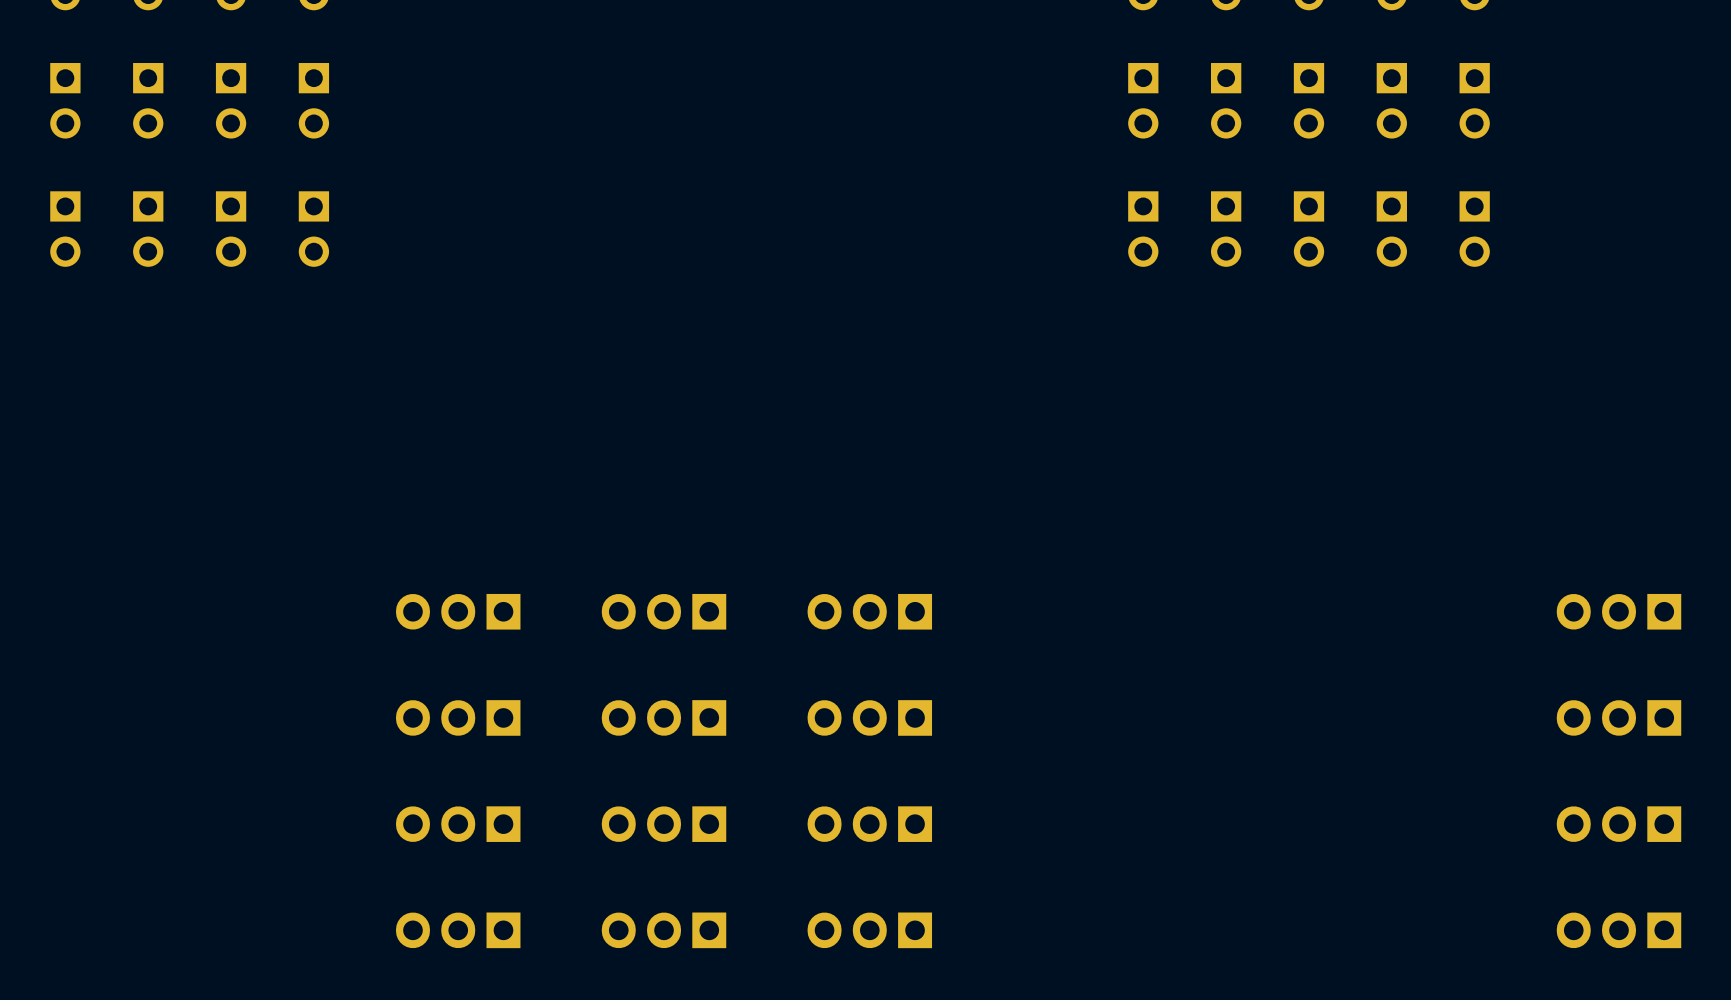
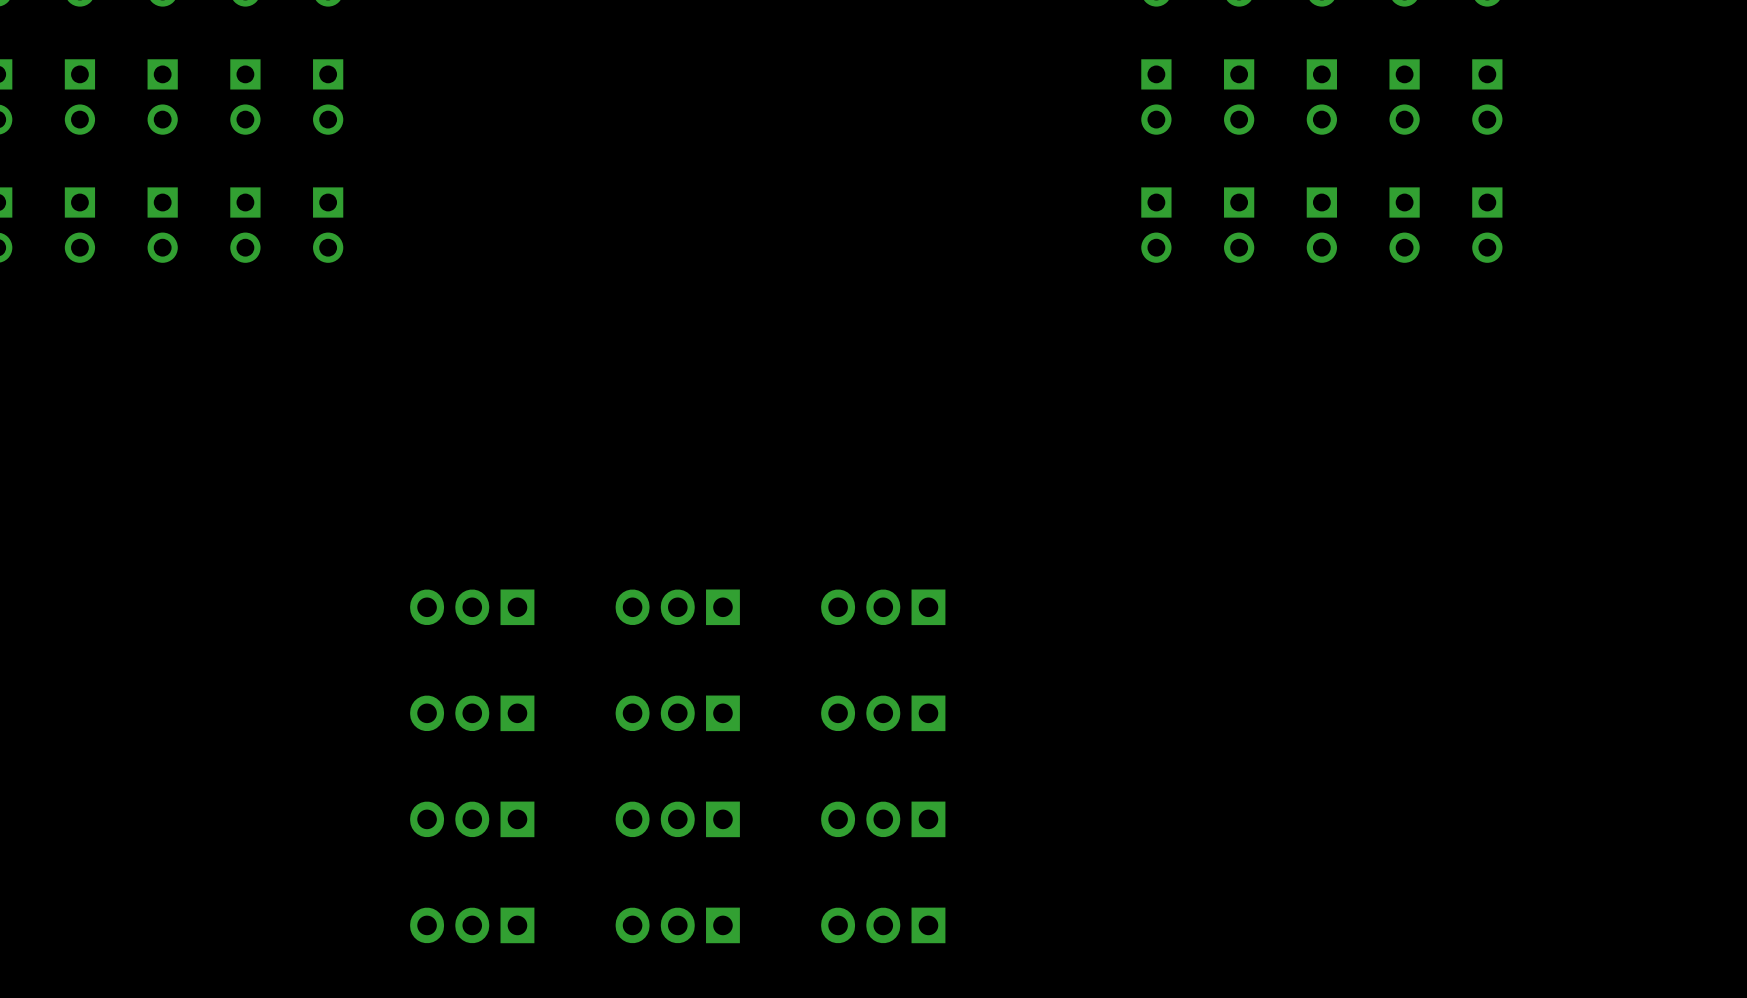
part: (1619, 611) -> none
part: (1619, 717) -> none
part: (1619, 824) -> none
part: (1619, 930) -> none

